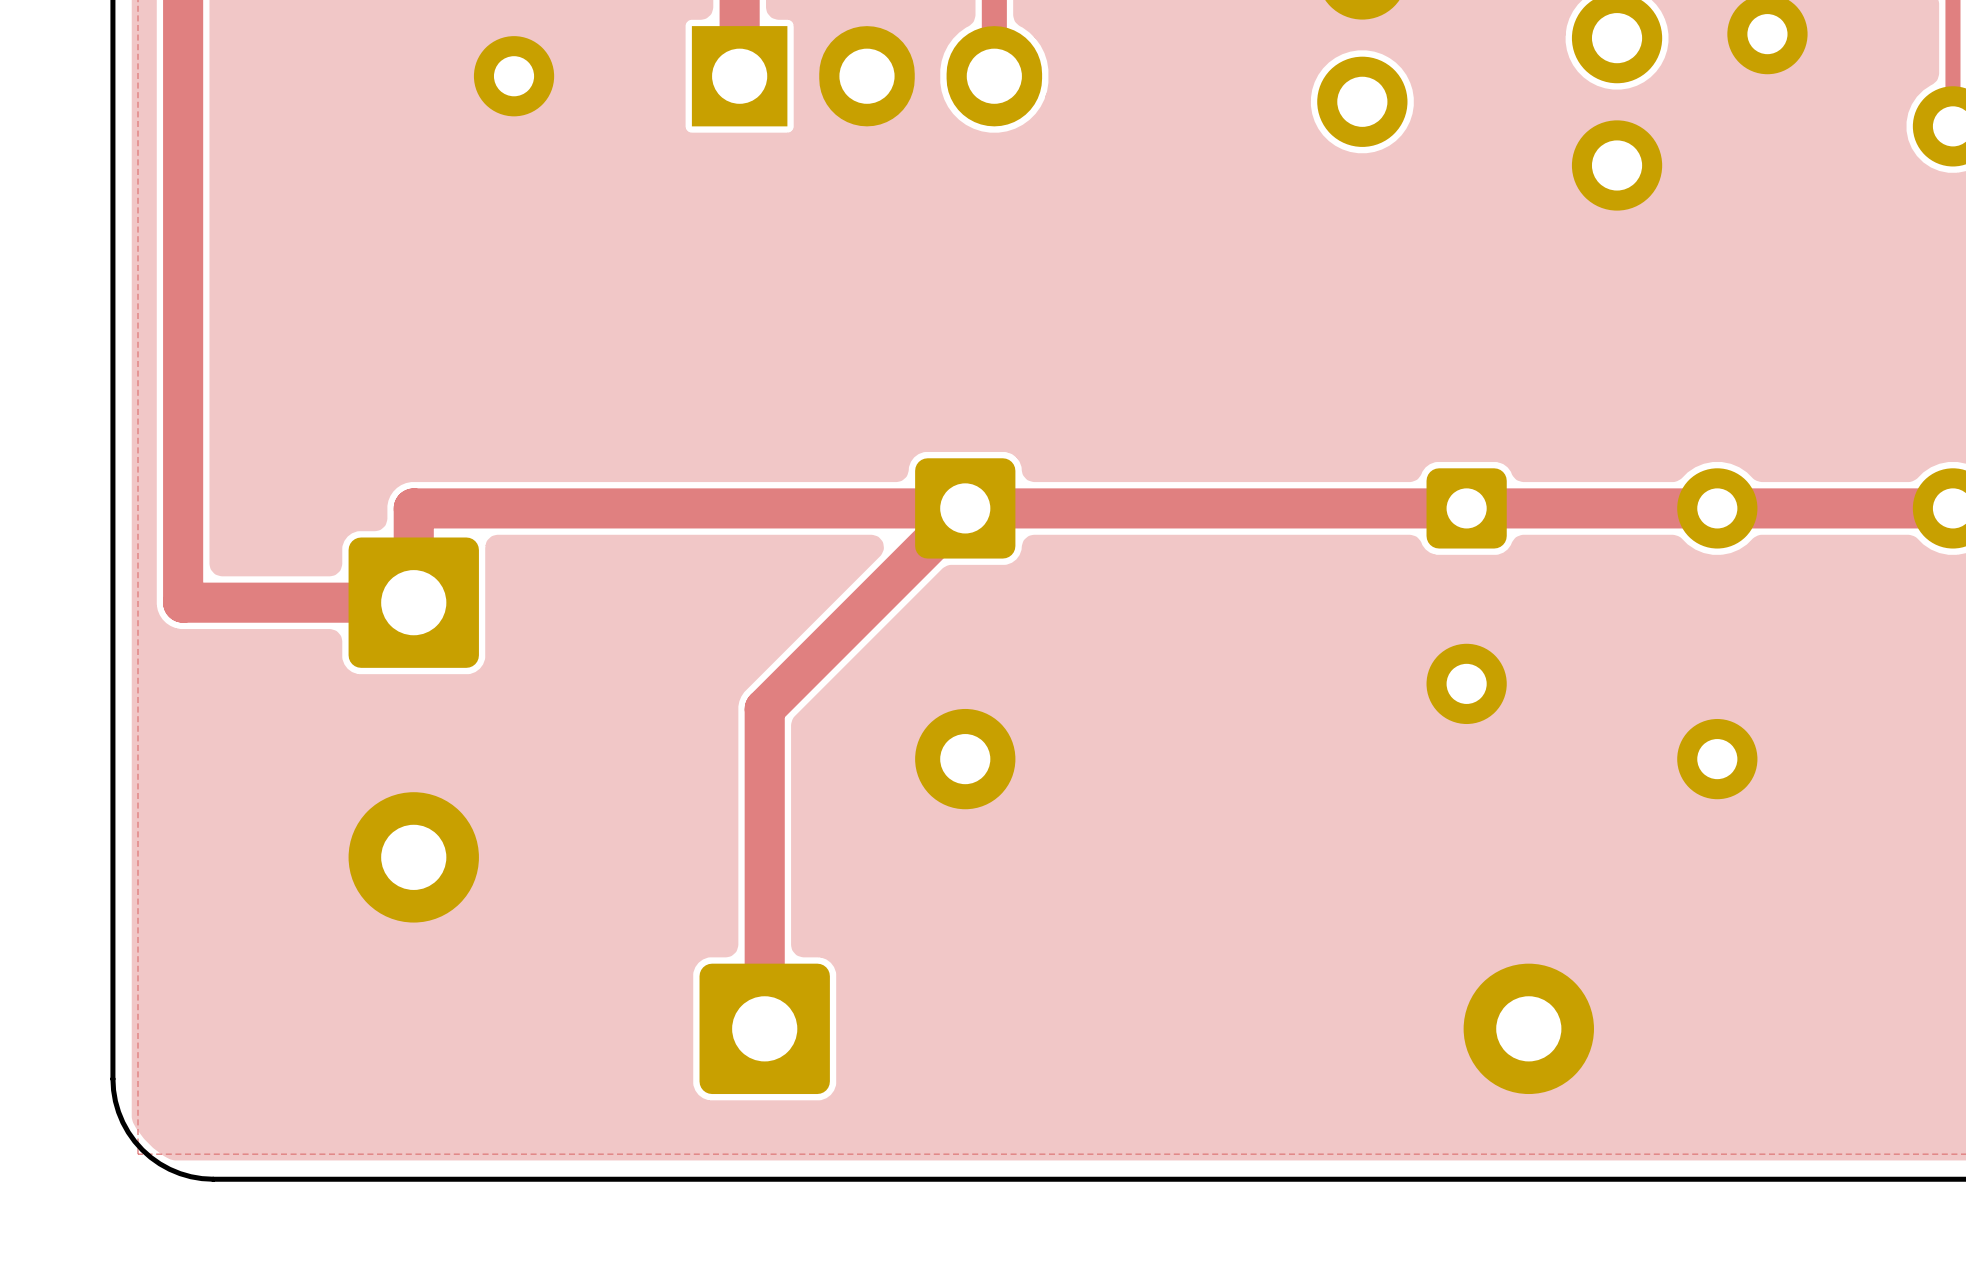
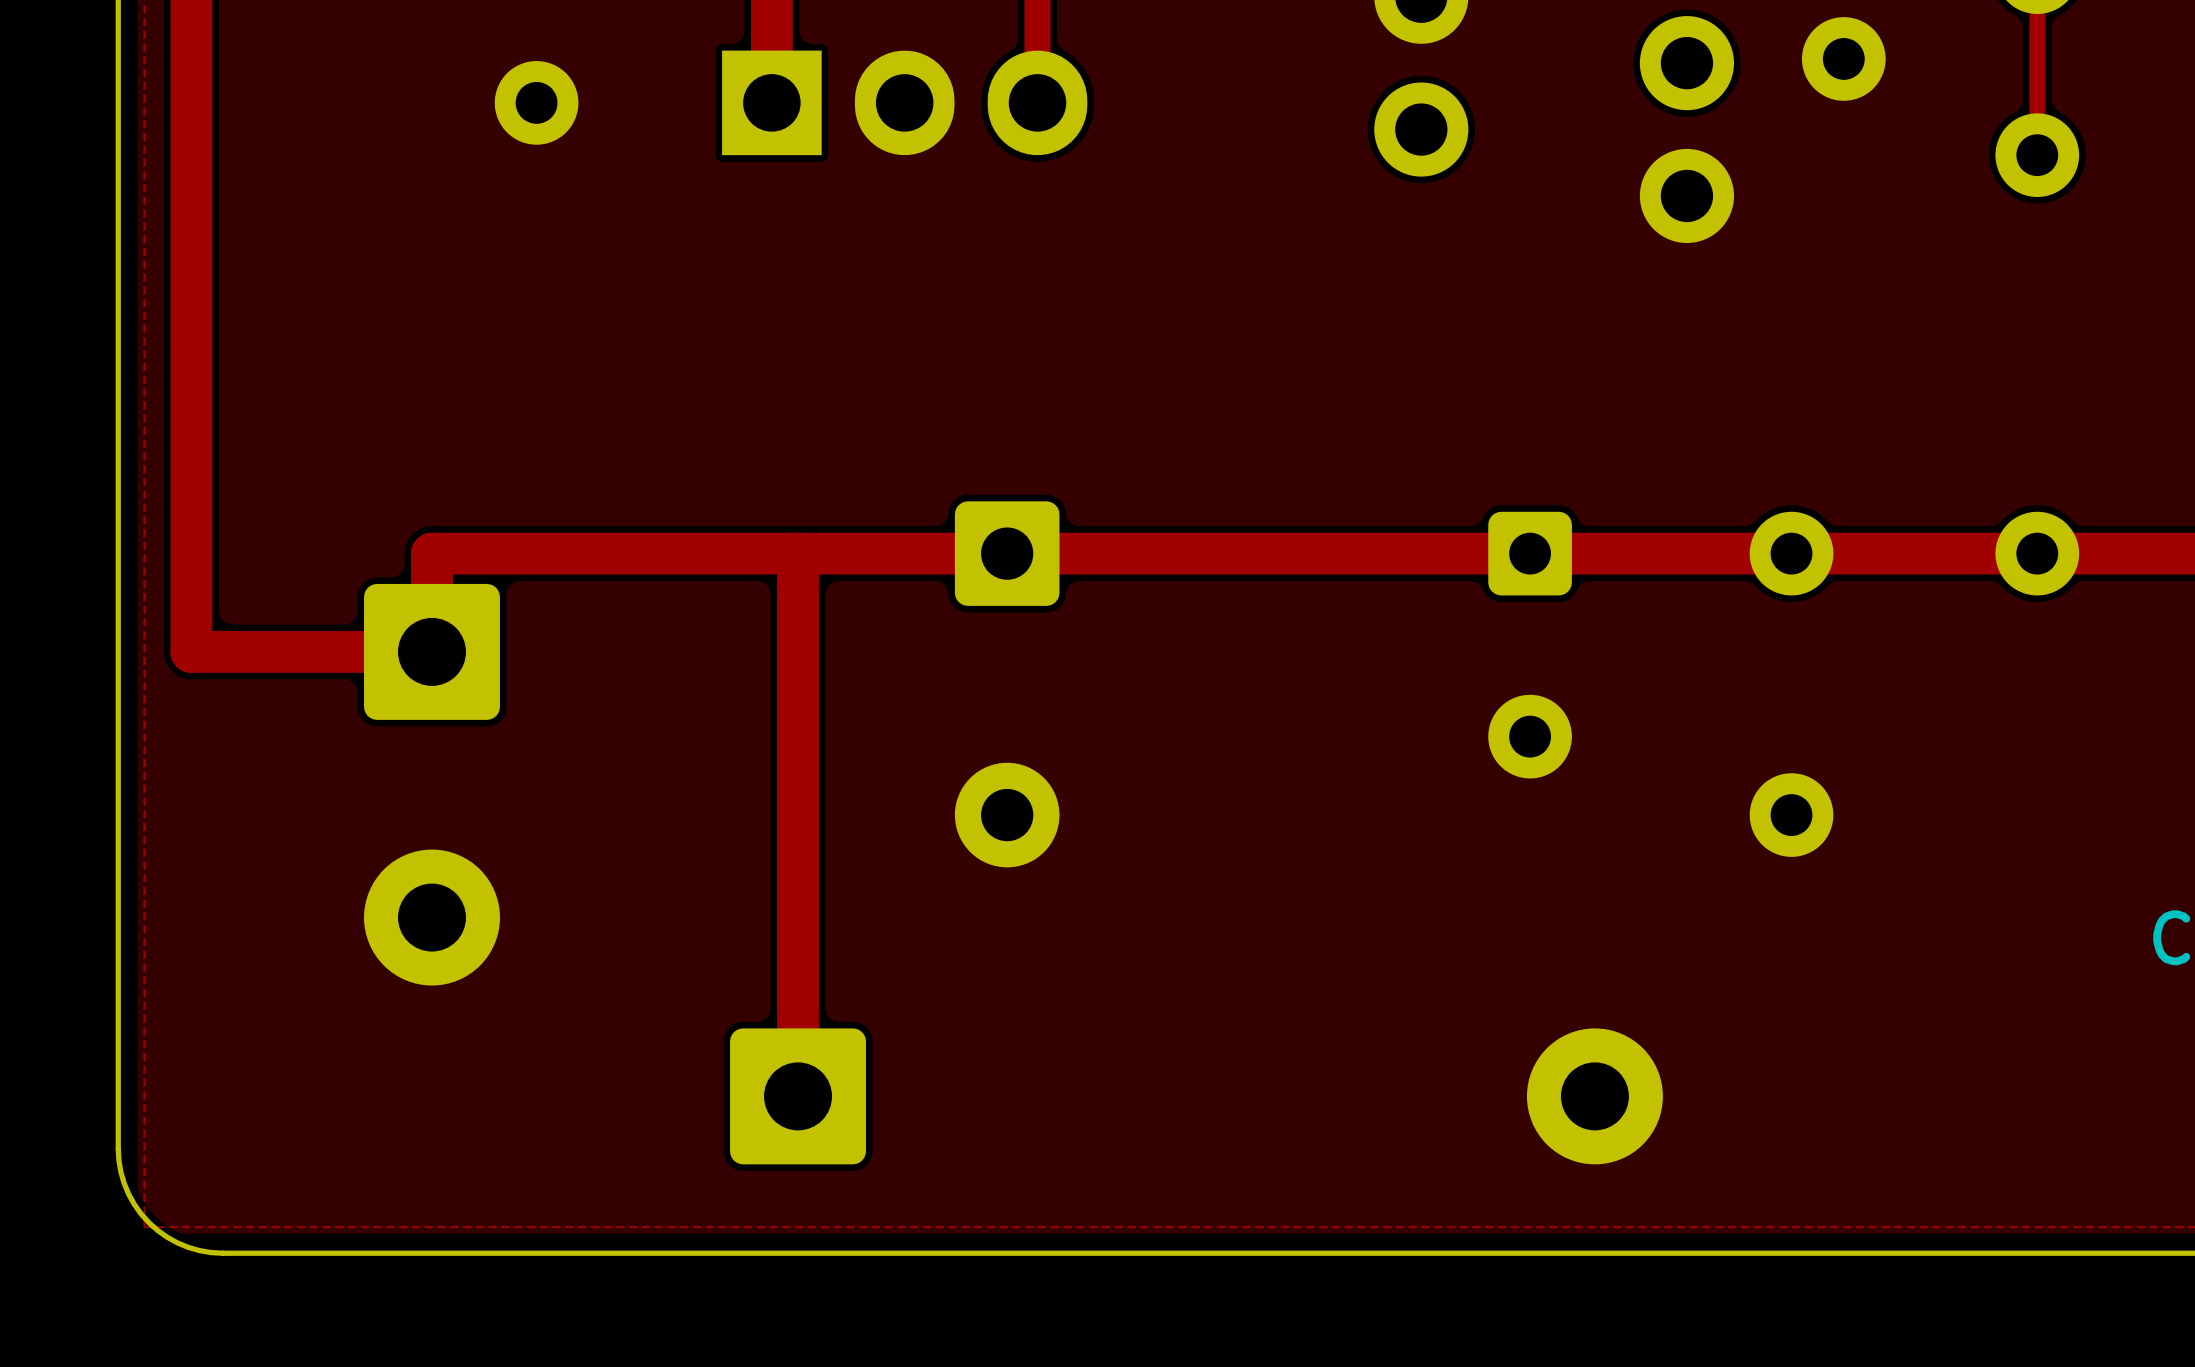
track: (965, 508) (764, 708) -> (798, 553) (798, 762)

